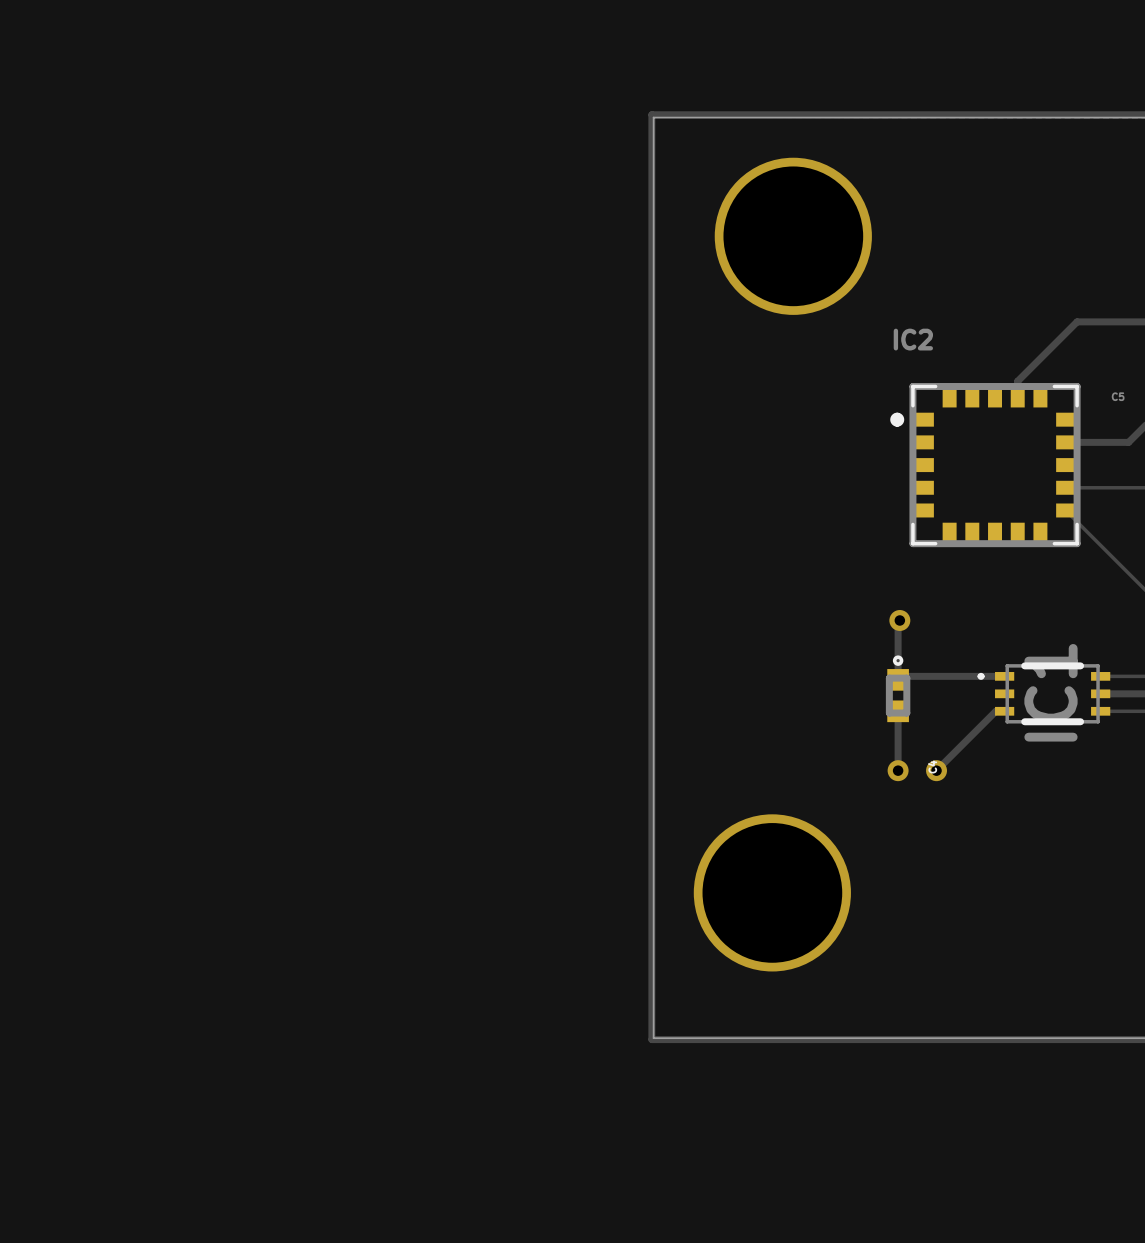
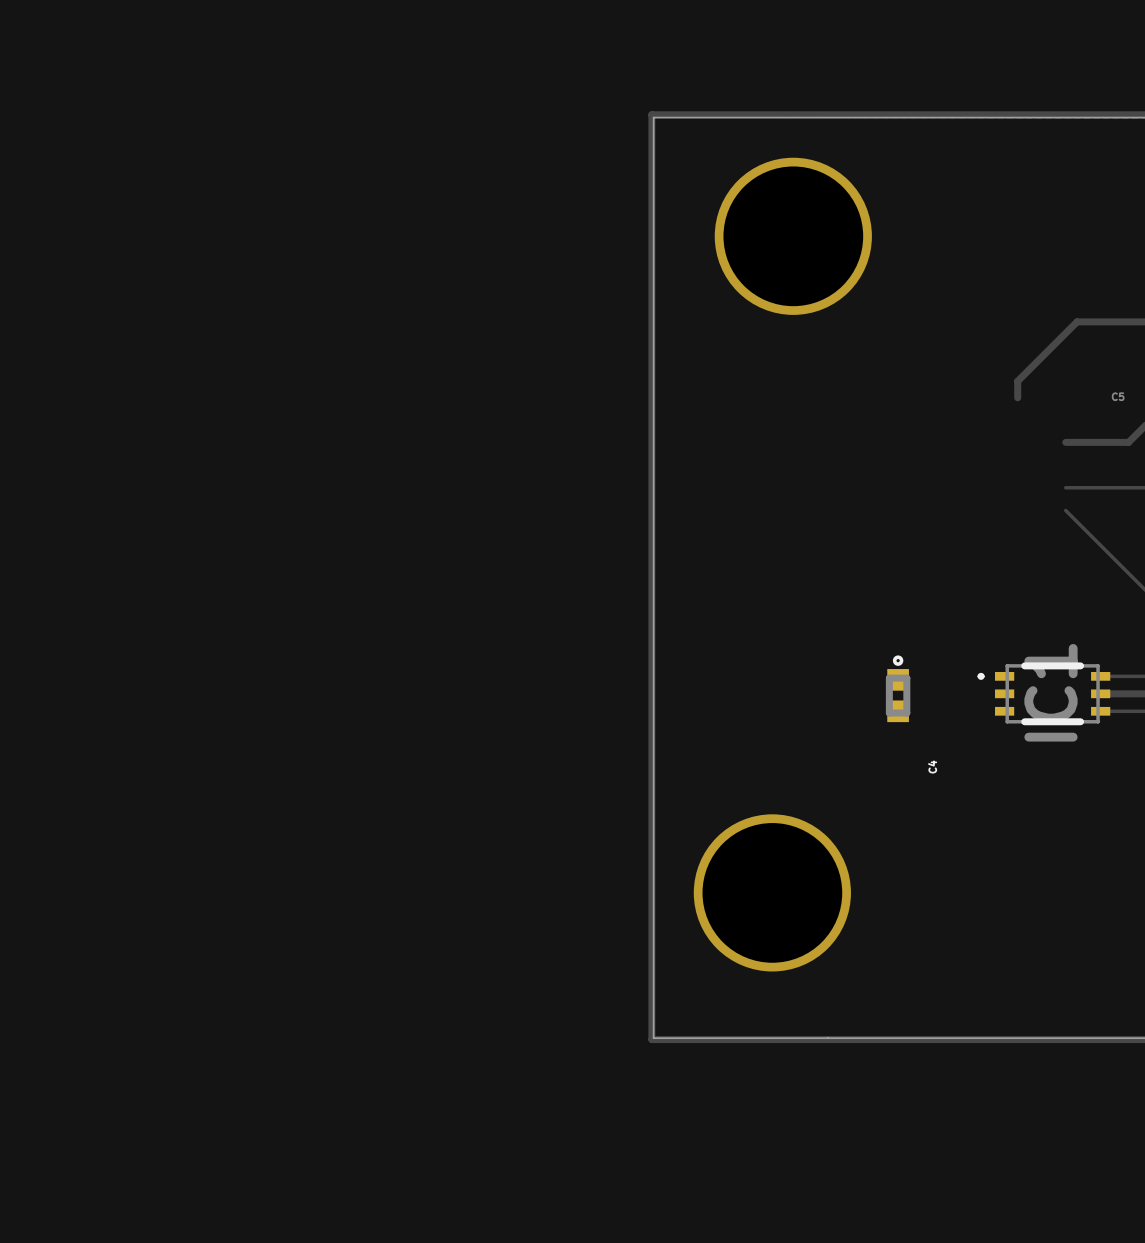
IC2: (985, 465) -> none
track: (899, 620) (898, 622) (898, 679) (901, 676) (1004, 676) -> none
via: (899, 620) -> none
track: (898, 711) (898, 770) -> none
track: (1004, 711) (995, 711) (936, 770) -> none
via: (898, 770) -> none
via: (936, 770) -> none

